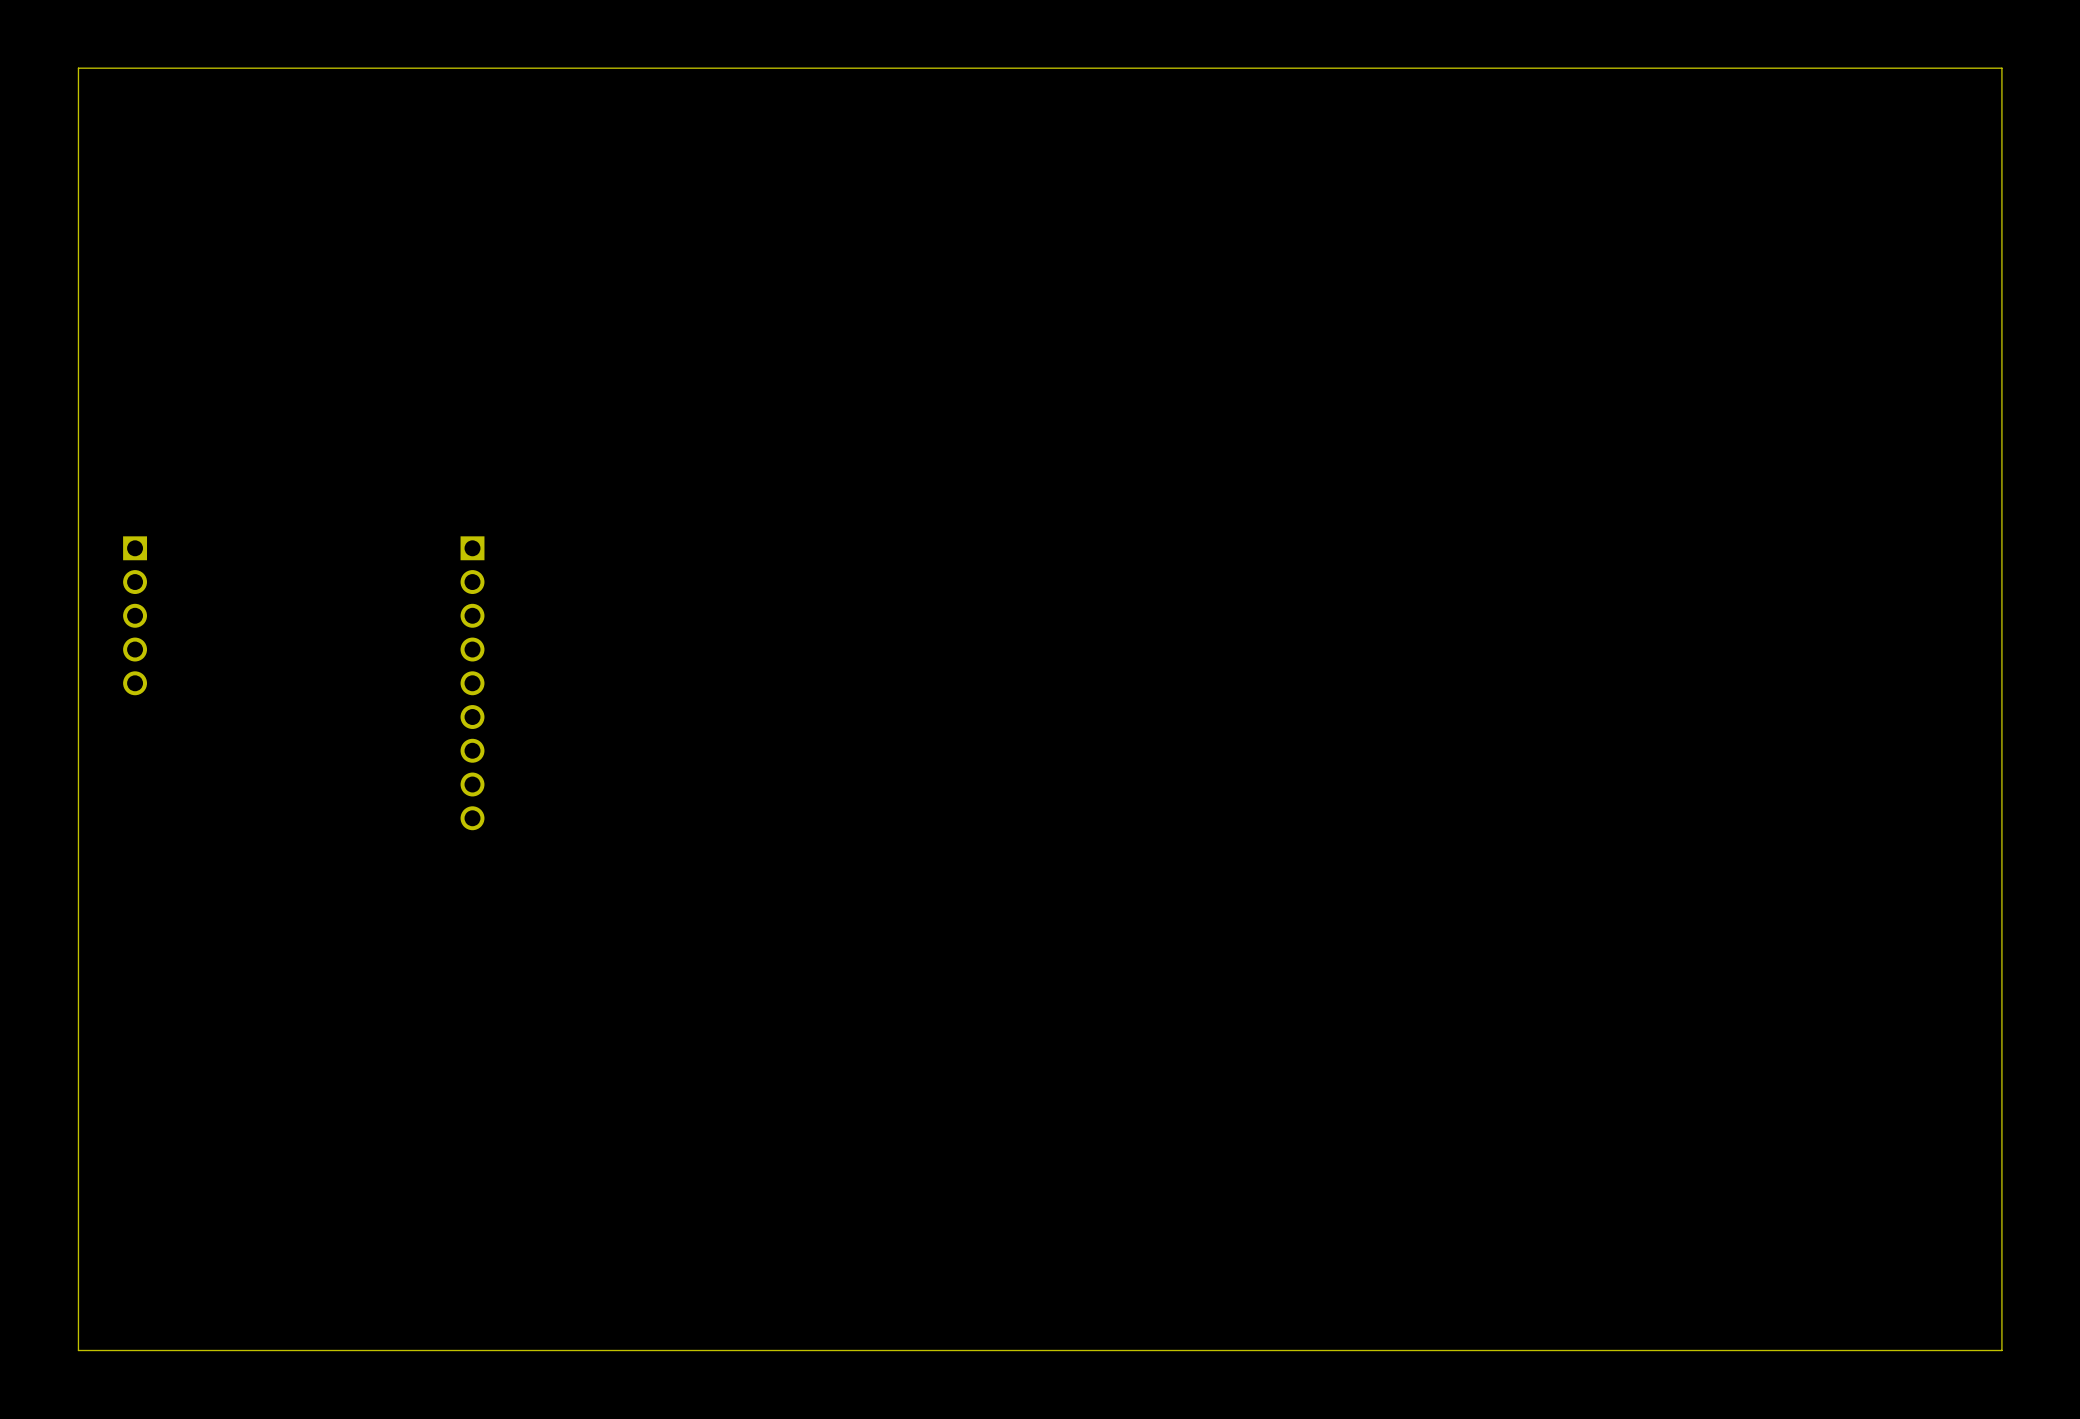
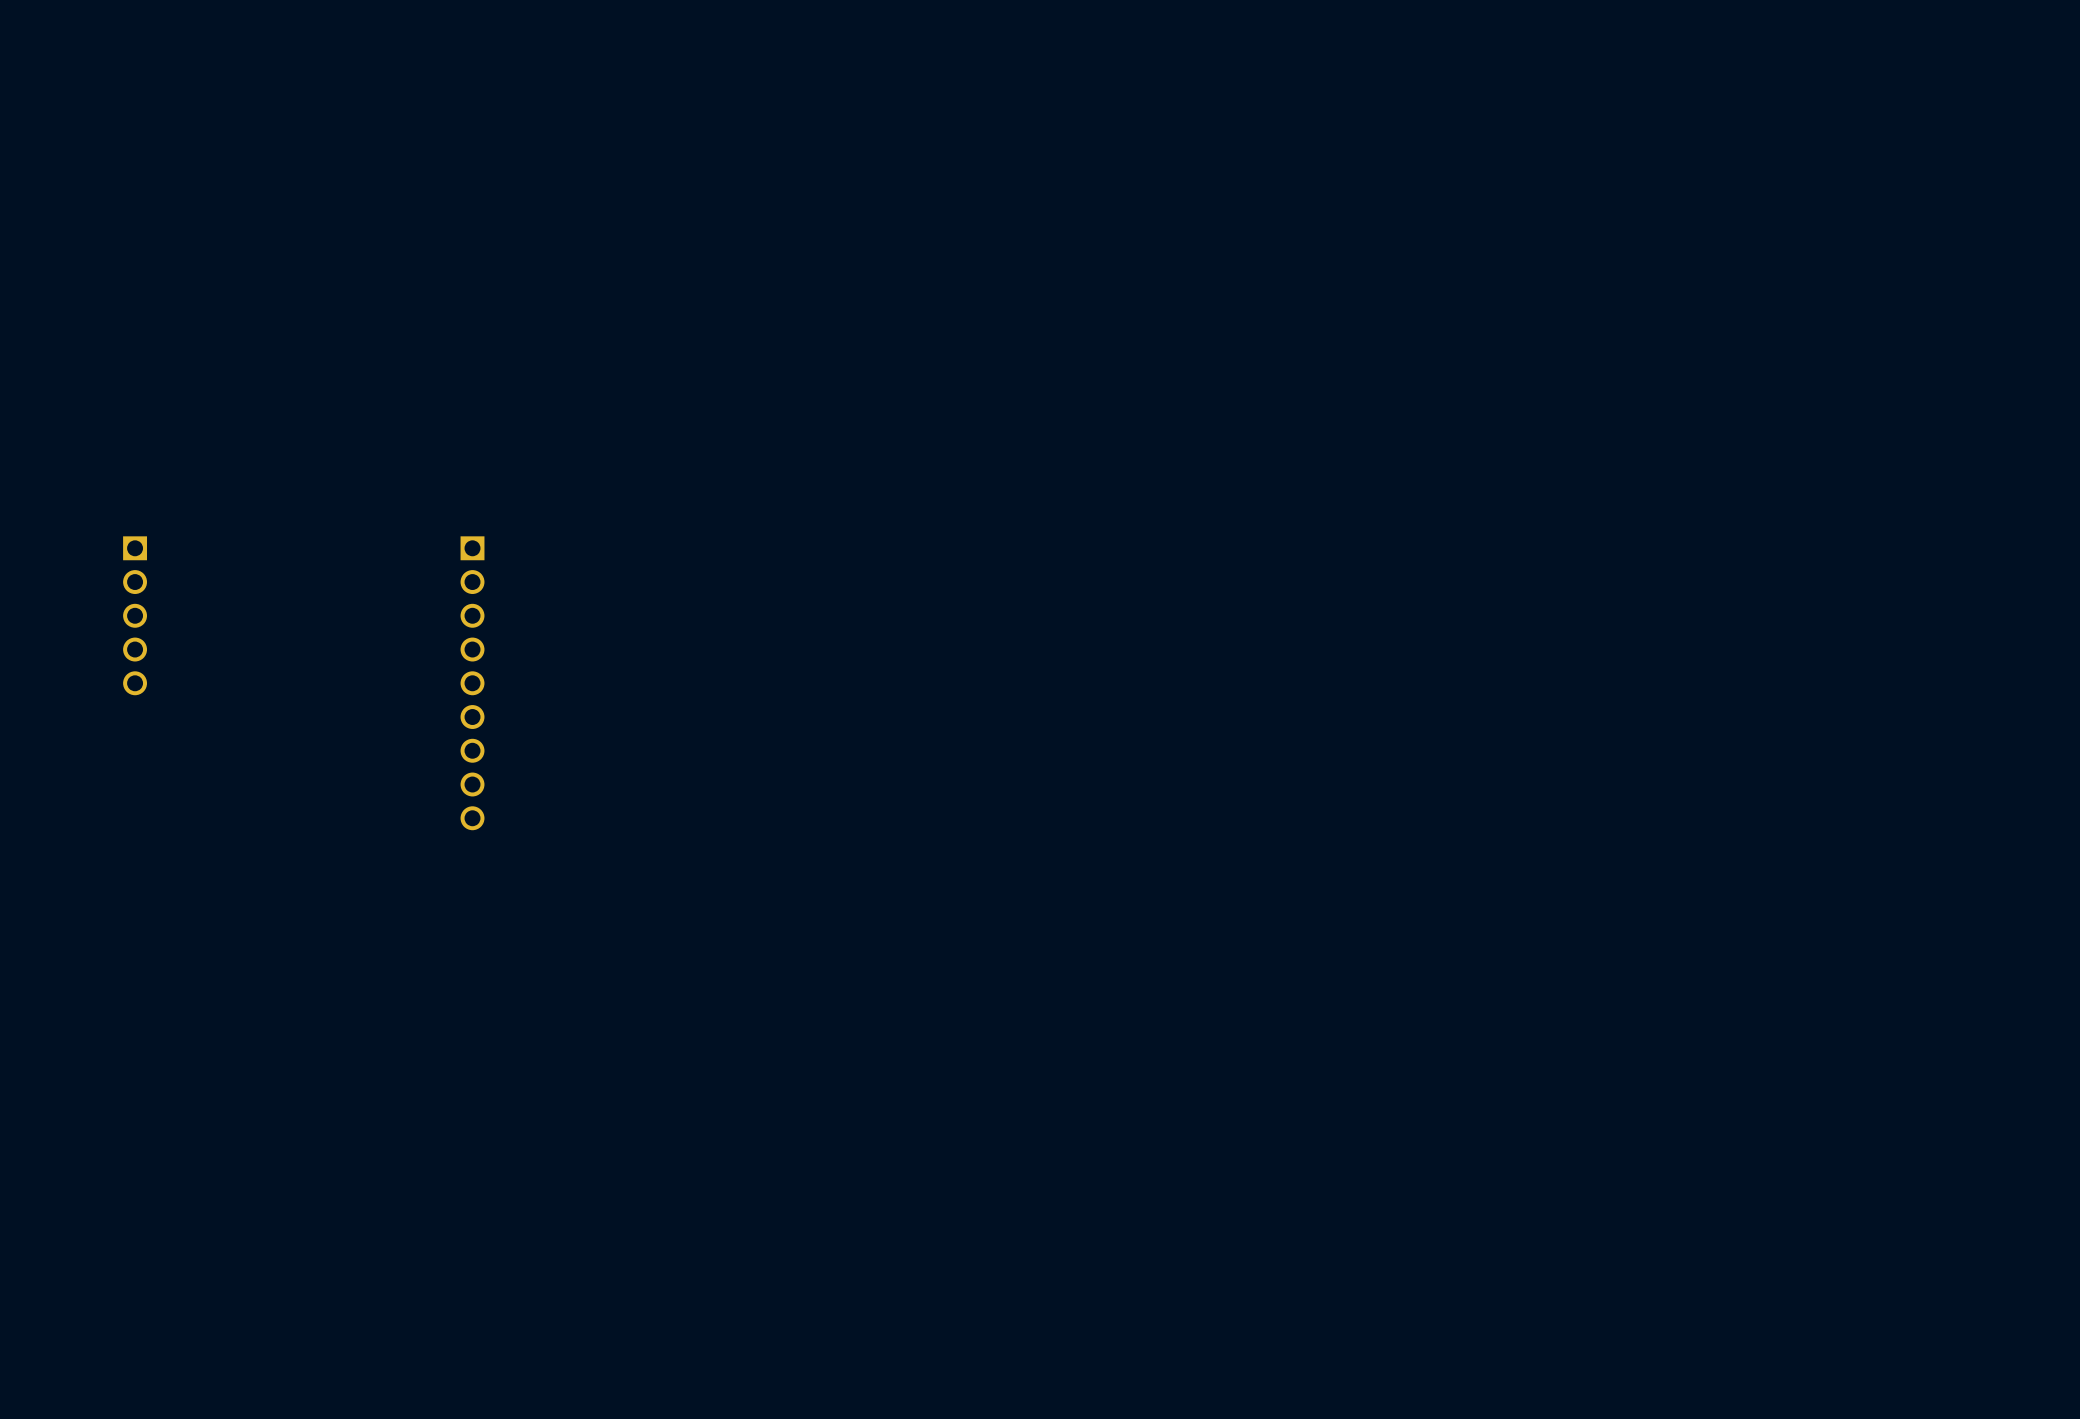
board edge: (2001, 68) (78, 68) (78, 1350) (2001, 1350) (2001, 68) -> none

